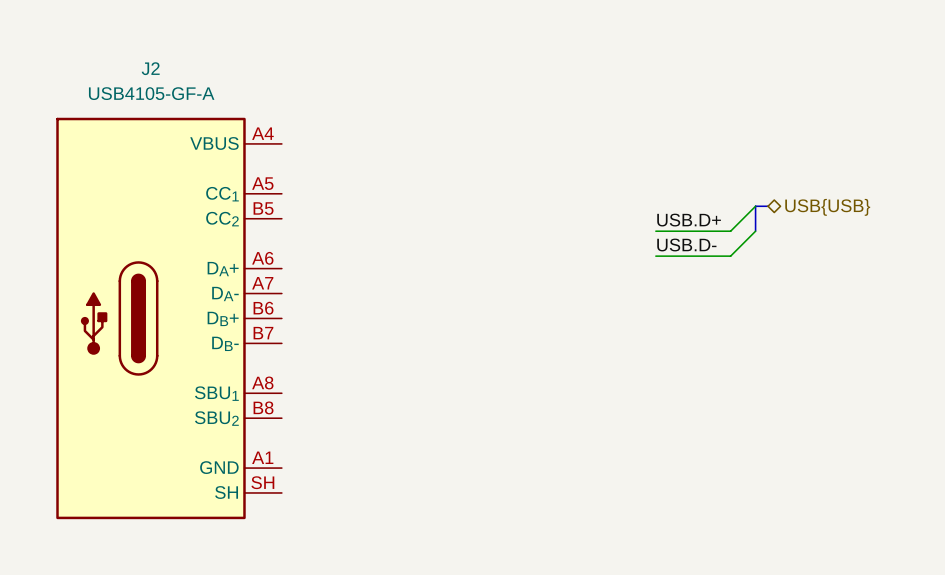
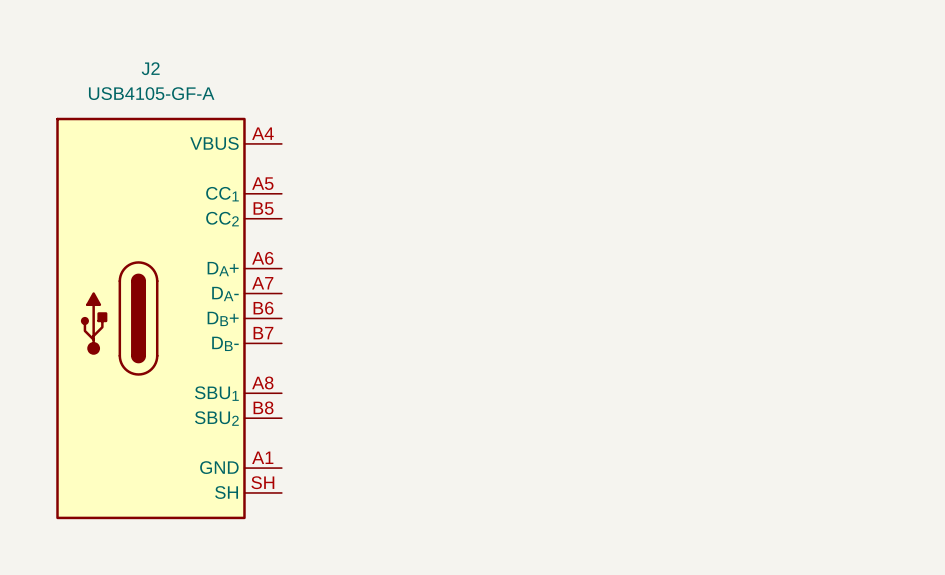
wire: (755, 206) (730, 231) (655, 231) -> none
bus: (768, 206) (755, 206) (755, 231) -> none
hierarchical label: USB{USB} (827, 207) -> none
label: USB.D+ (689, 220) -> none
wire: (755, 231) (730, 256) (655, 256) -> none
label: USB.D- (686, 245) -> none

